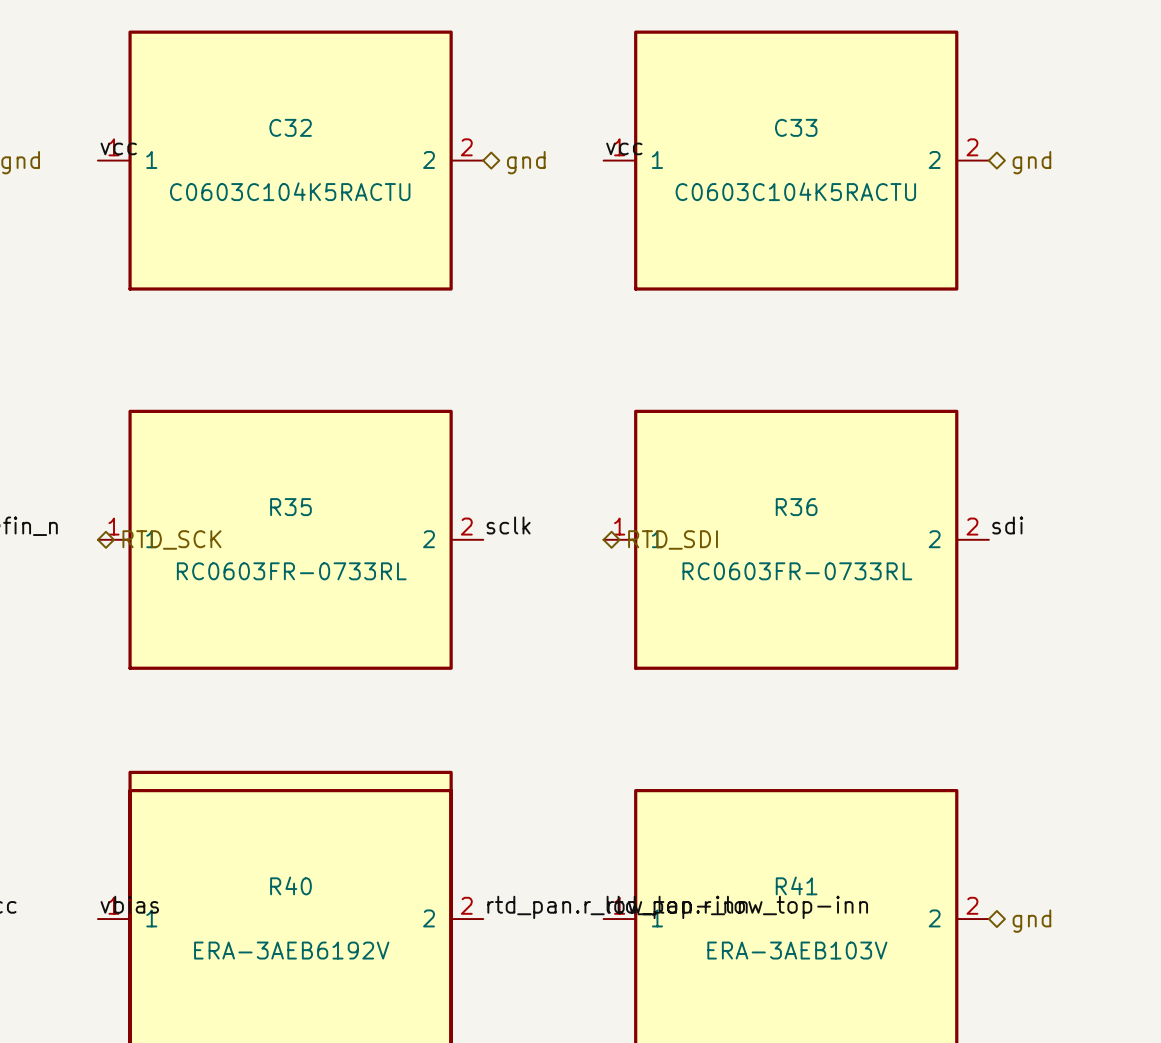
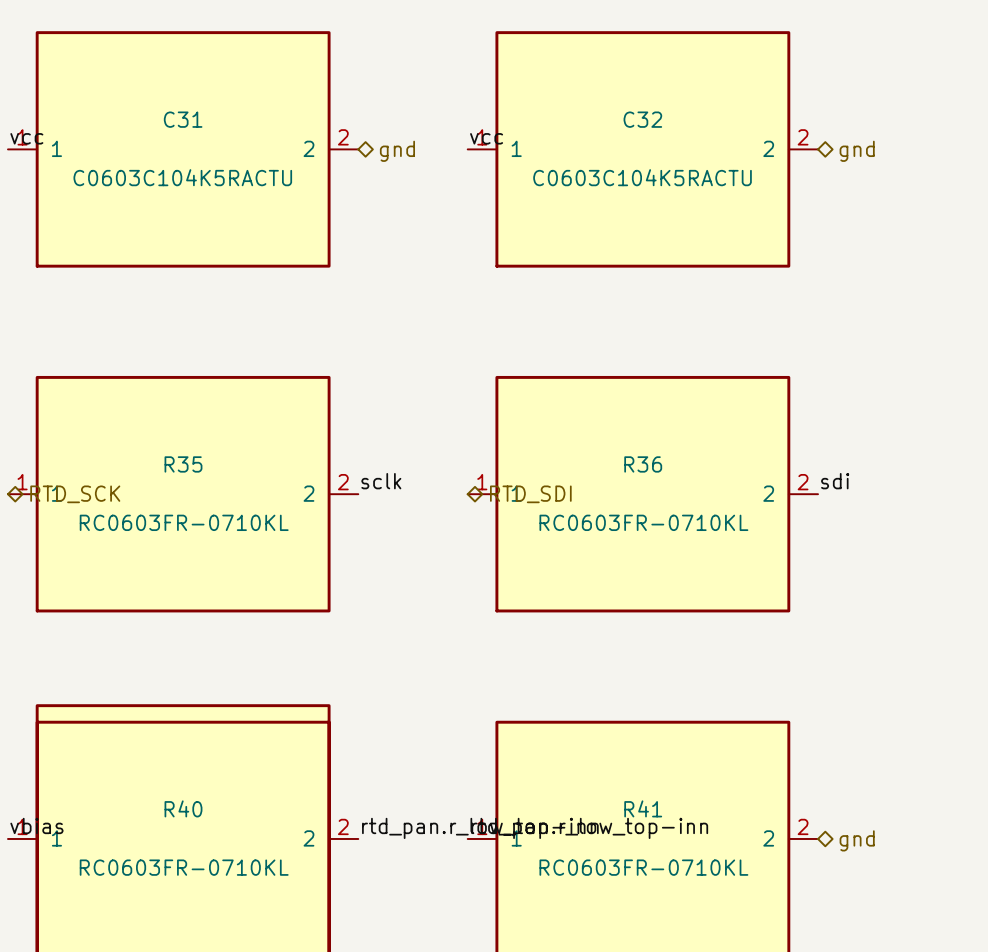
C32 name: C32 (290, 127) -> C31 (183, 119)
C33 name: C33 (796, 127) -> C32 (642, 119)
R35 value: RC0603FR-0733RL (291, 571) -> RC0603FR-0710KL (184, 522)
R36 value: RC0603FR-0733RL (797, 571) -> RC0603FR-0710KL (643, 522)
R40 value: ERA-3AEB6192V (291, 950) -> RC0603FR-0710KL (184, 867)
R41 value: ERA-3AEB103V (797, 950) -> RC0603FR-0710KL (643, 867)

